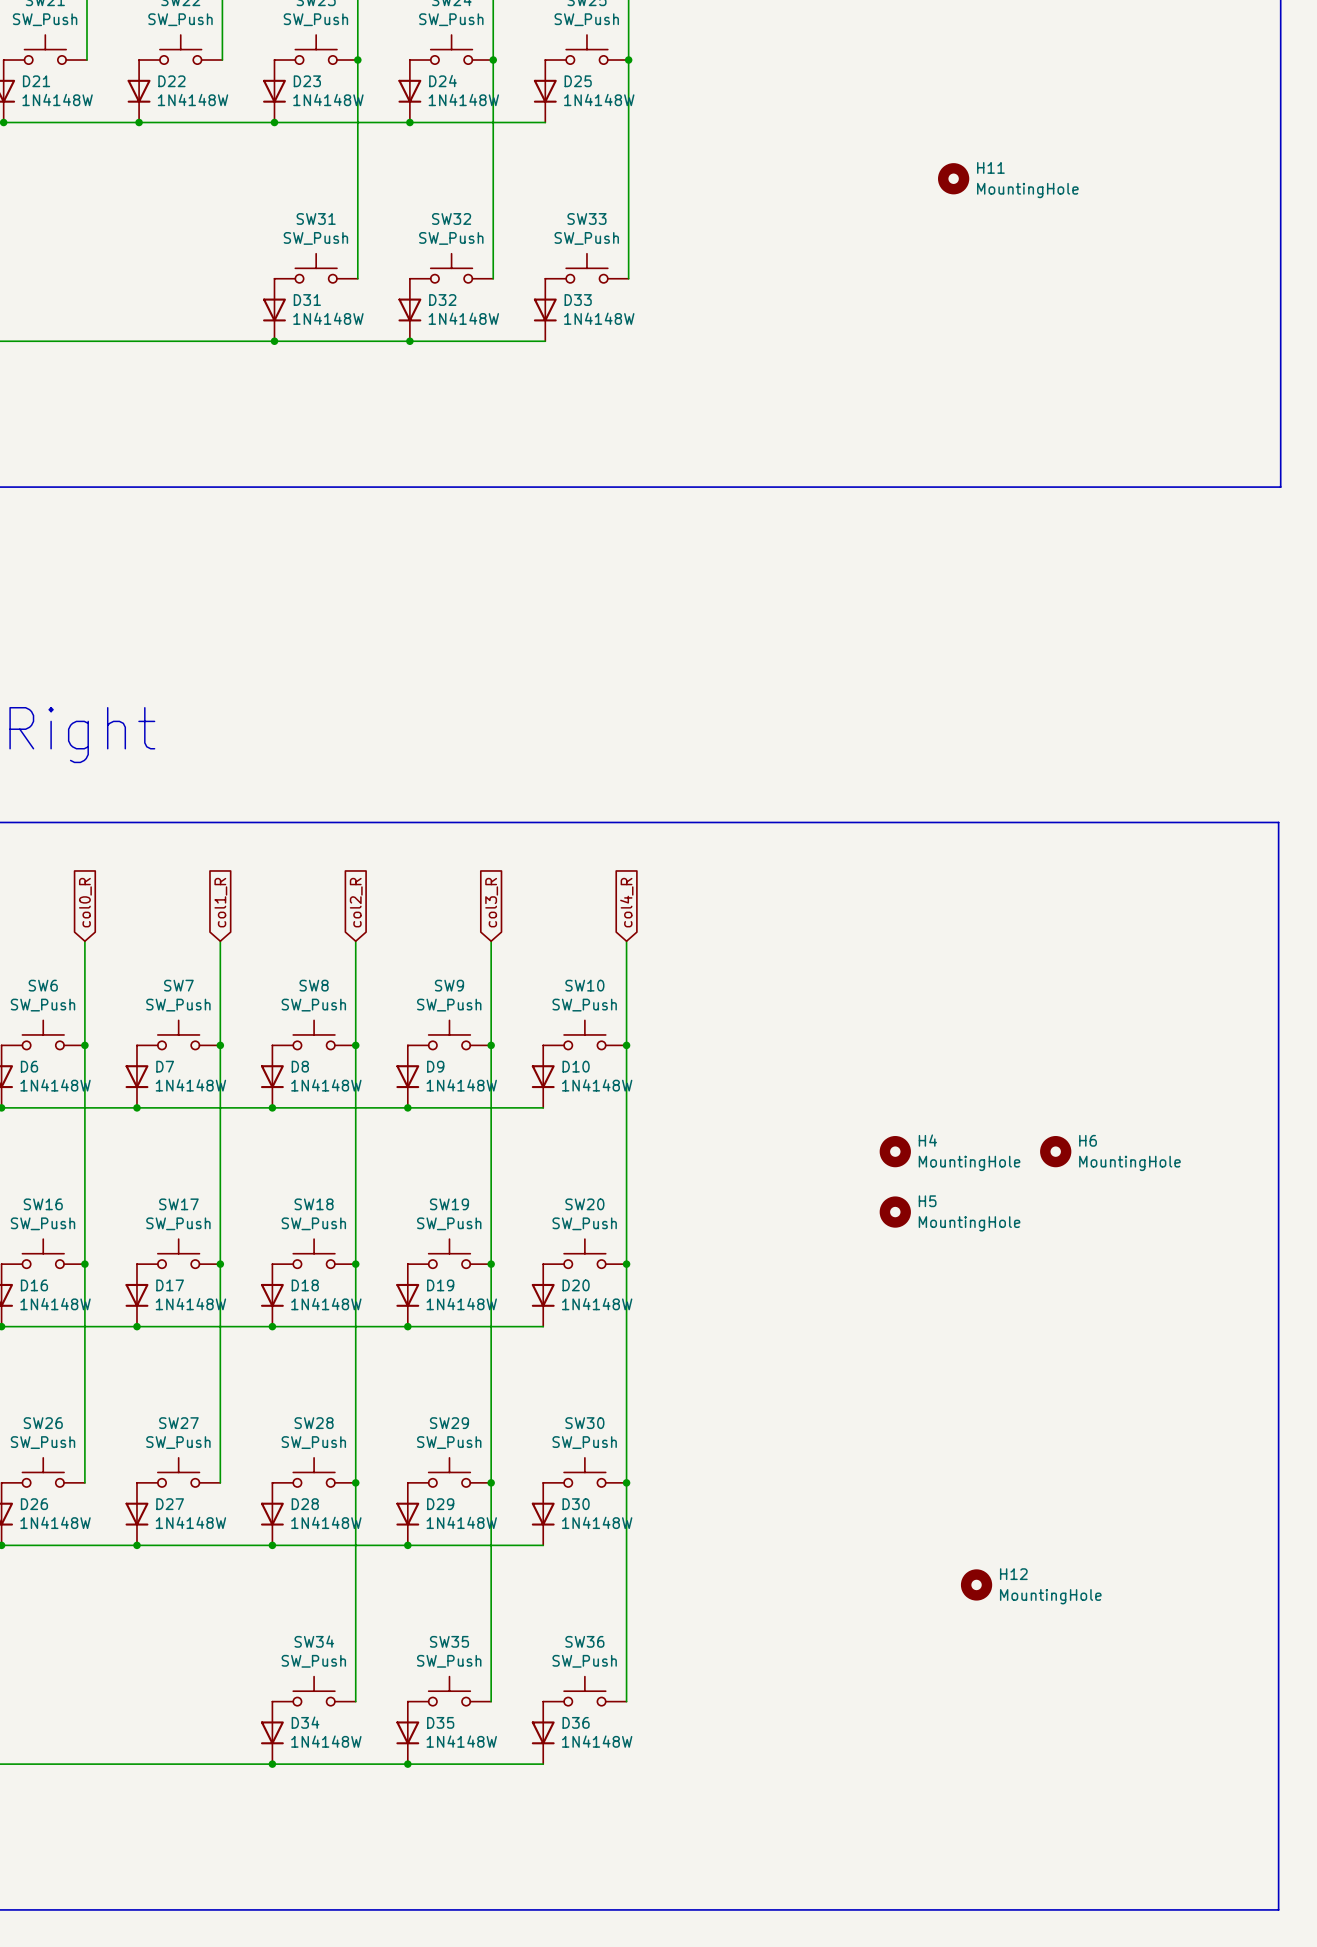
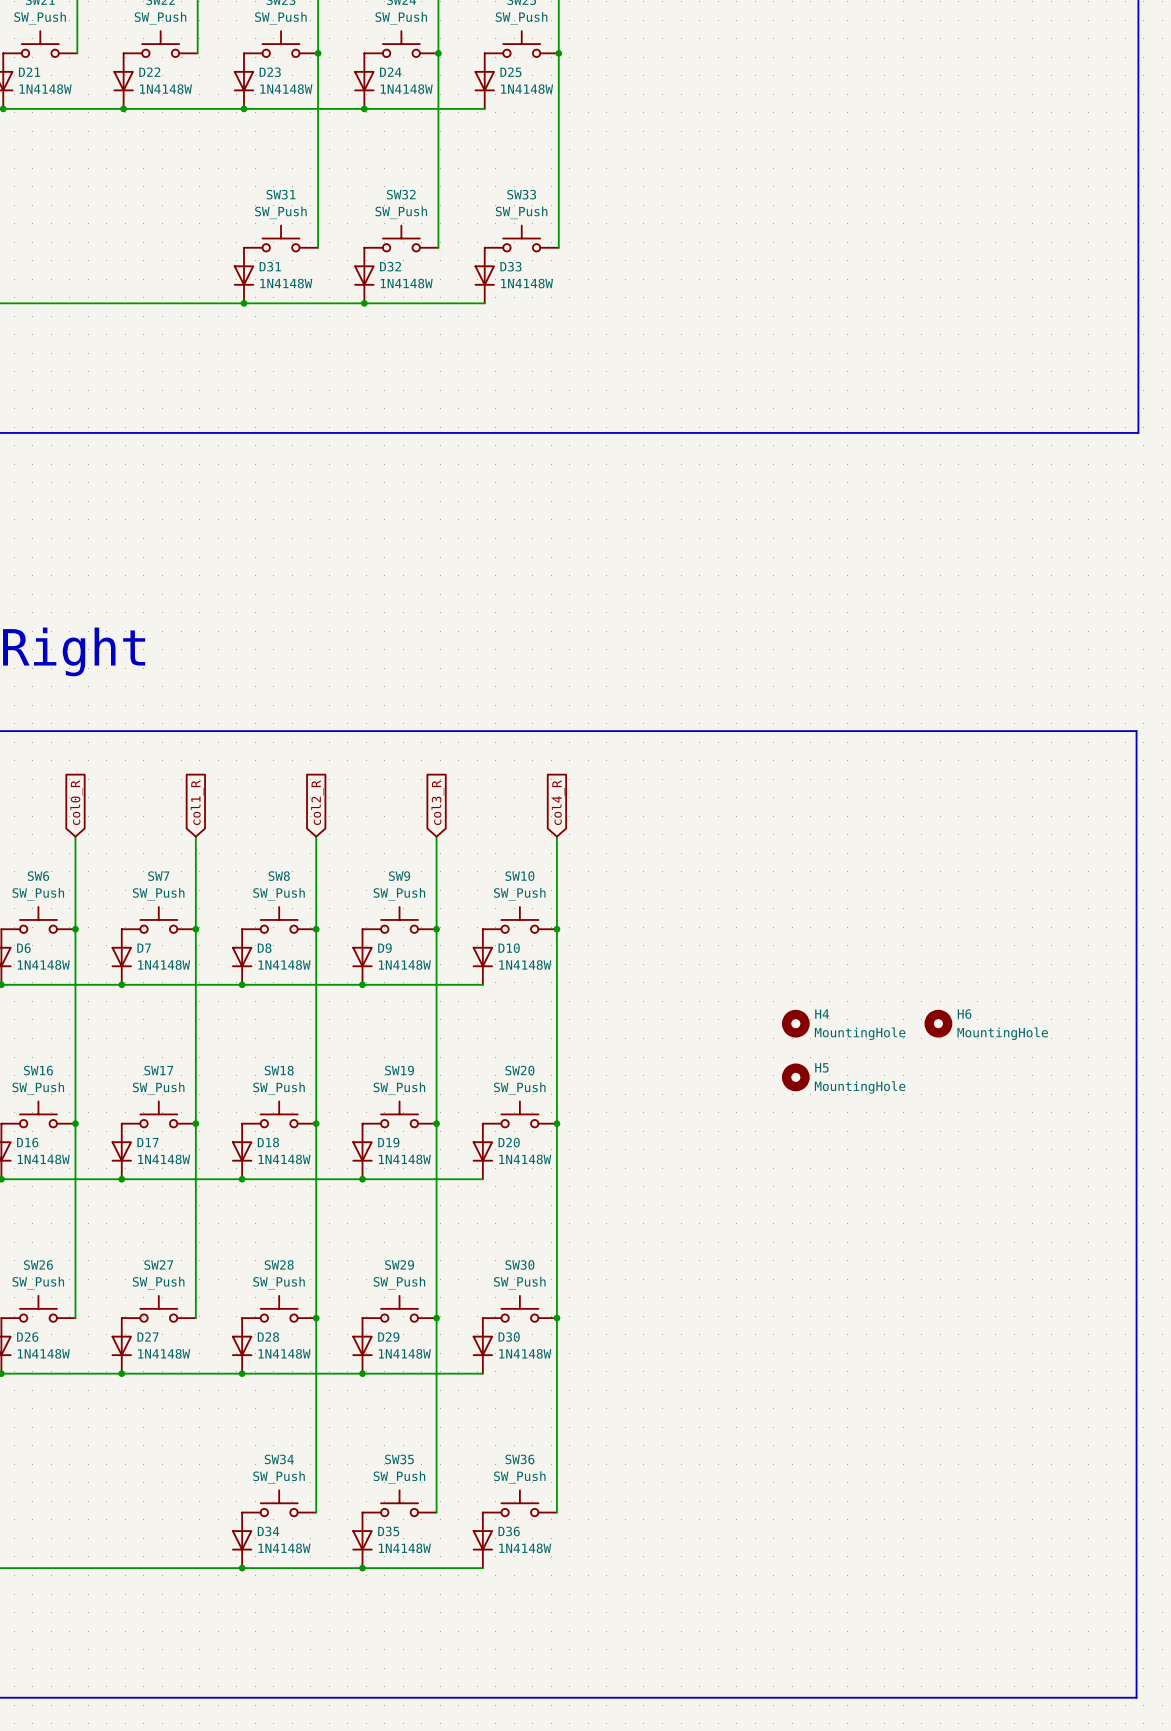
H11: MountingHole (953, 178) -> none
H12: MountingHole (976, 1584) -> none

